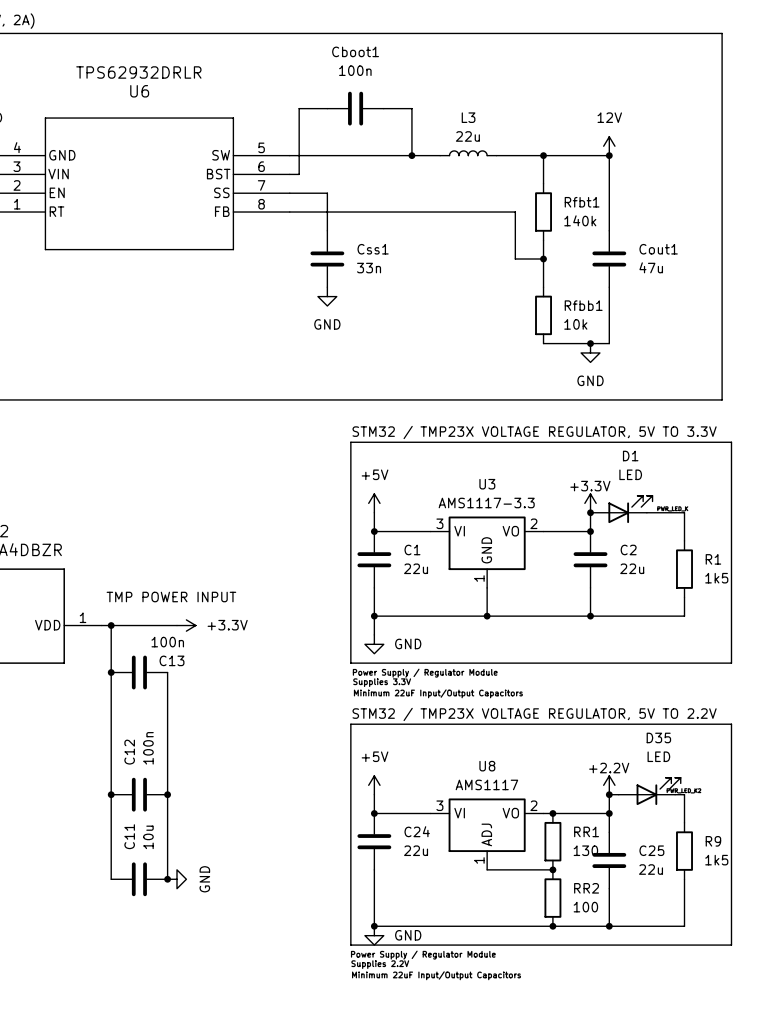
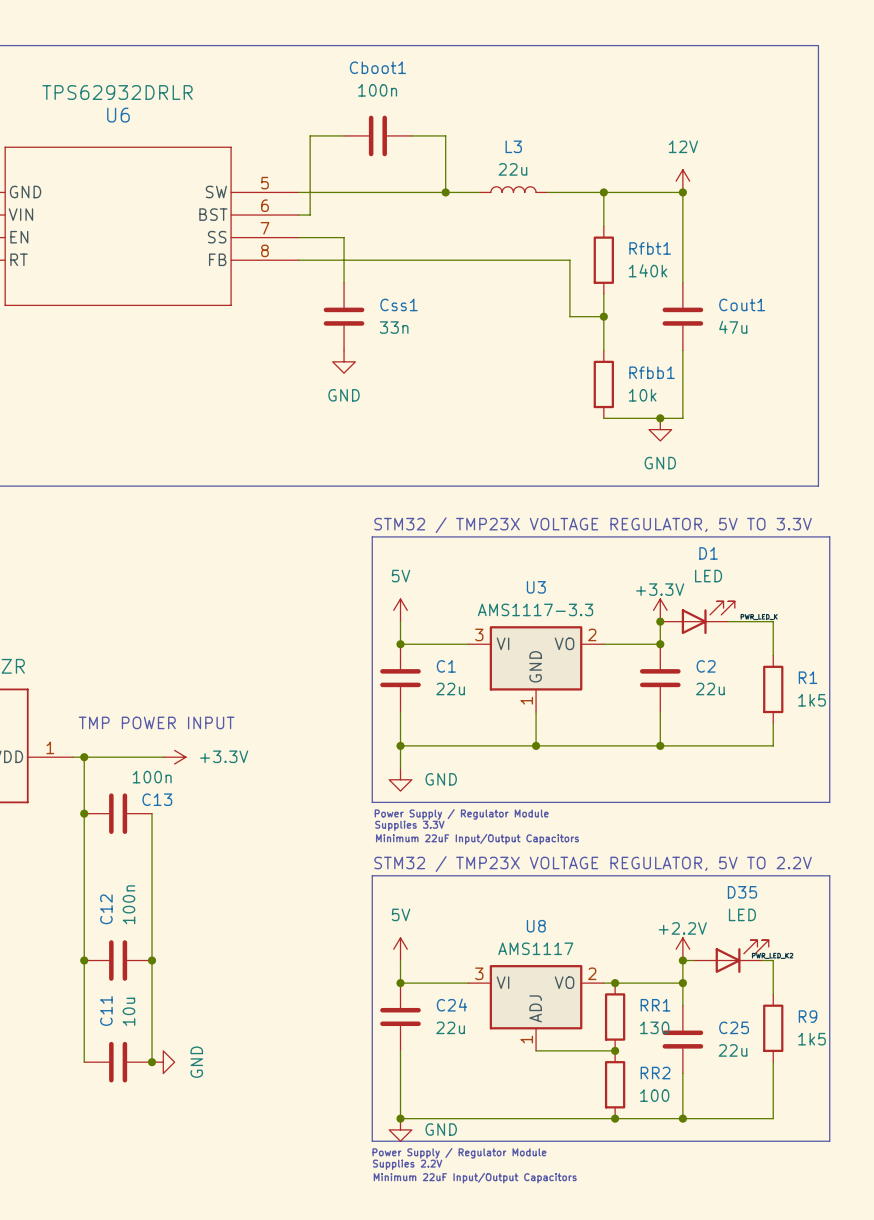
power symbol: +5V (374, 503) -> 5V (400, 610)
power symbol: +5V (374, 785) -> 5V (400, 949)

